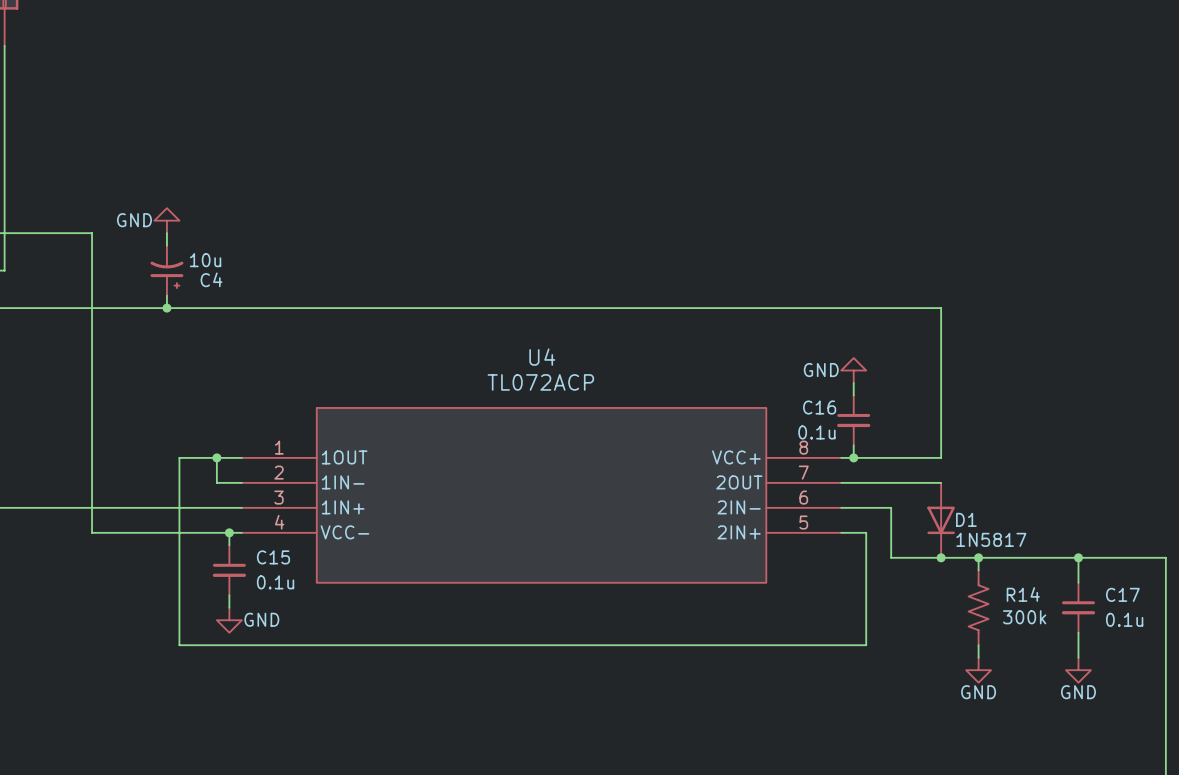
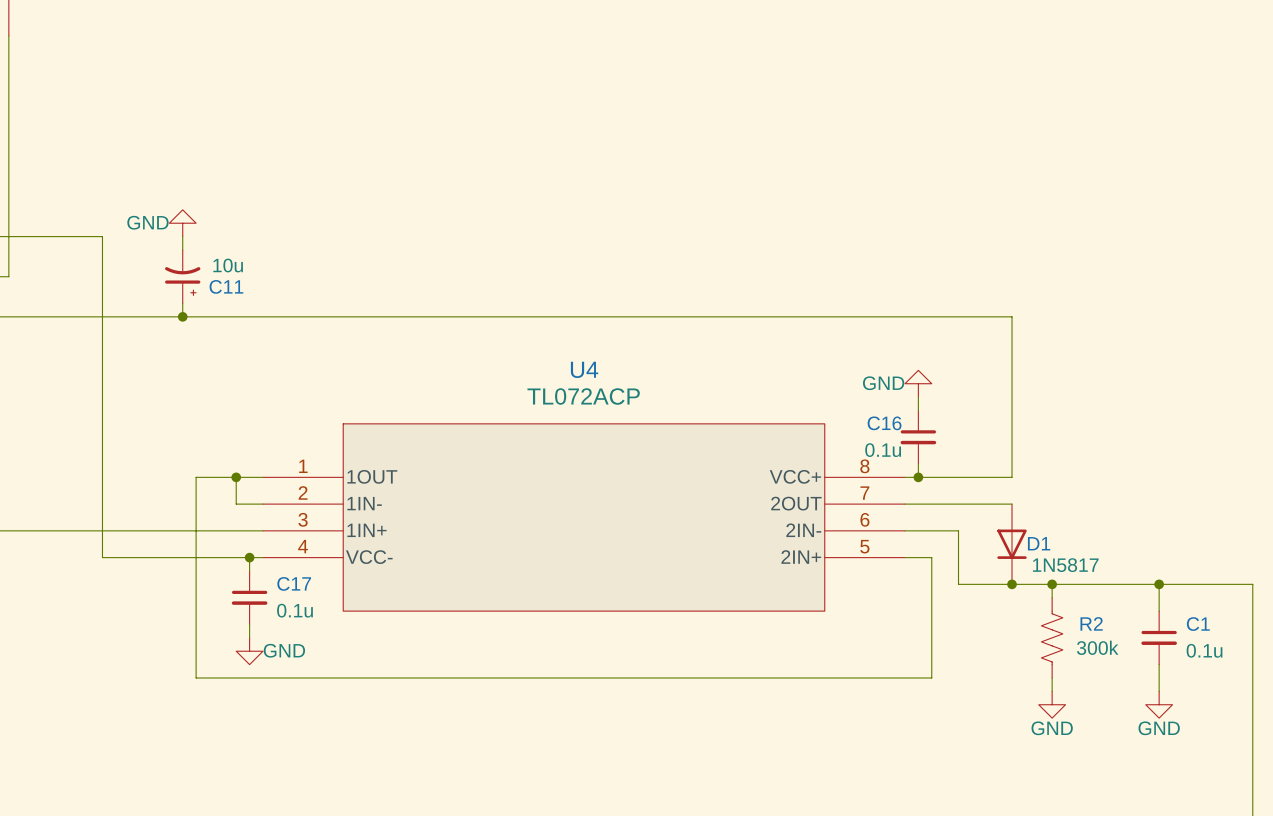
C4 name: C4 (211, 279) -> C11 (226, 286)
C15 name: C15 (273, 557) -> C17 (294, 583)
R14 name: R14 (1023, 594) -> R2 (1091, 623)
C17 name: C17 (1122, 594) -> C1 (1198, 624)

